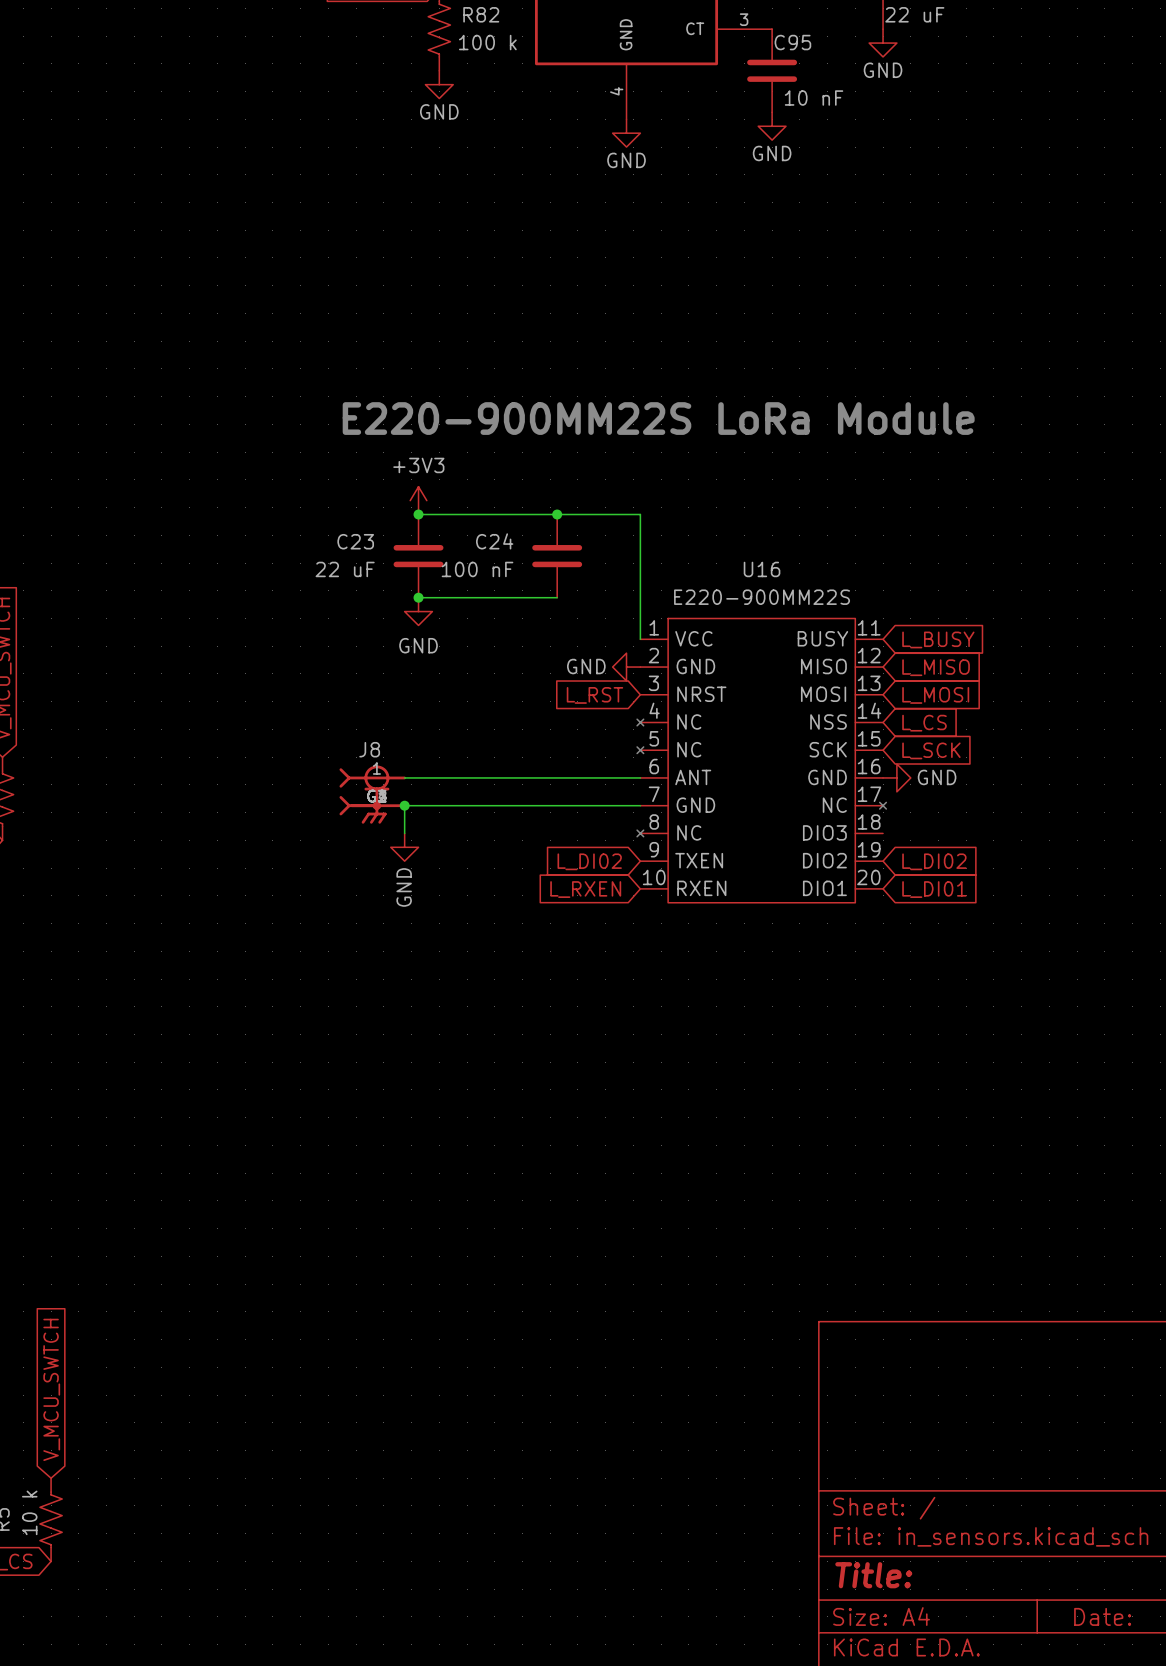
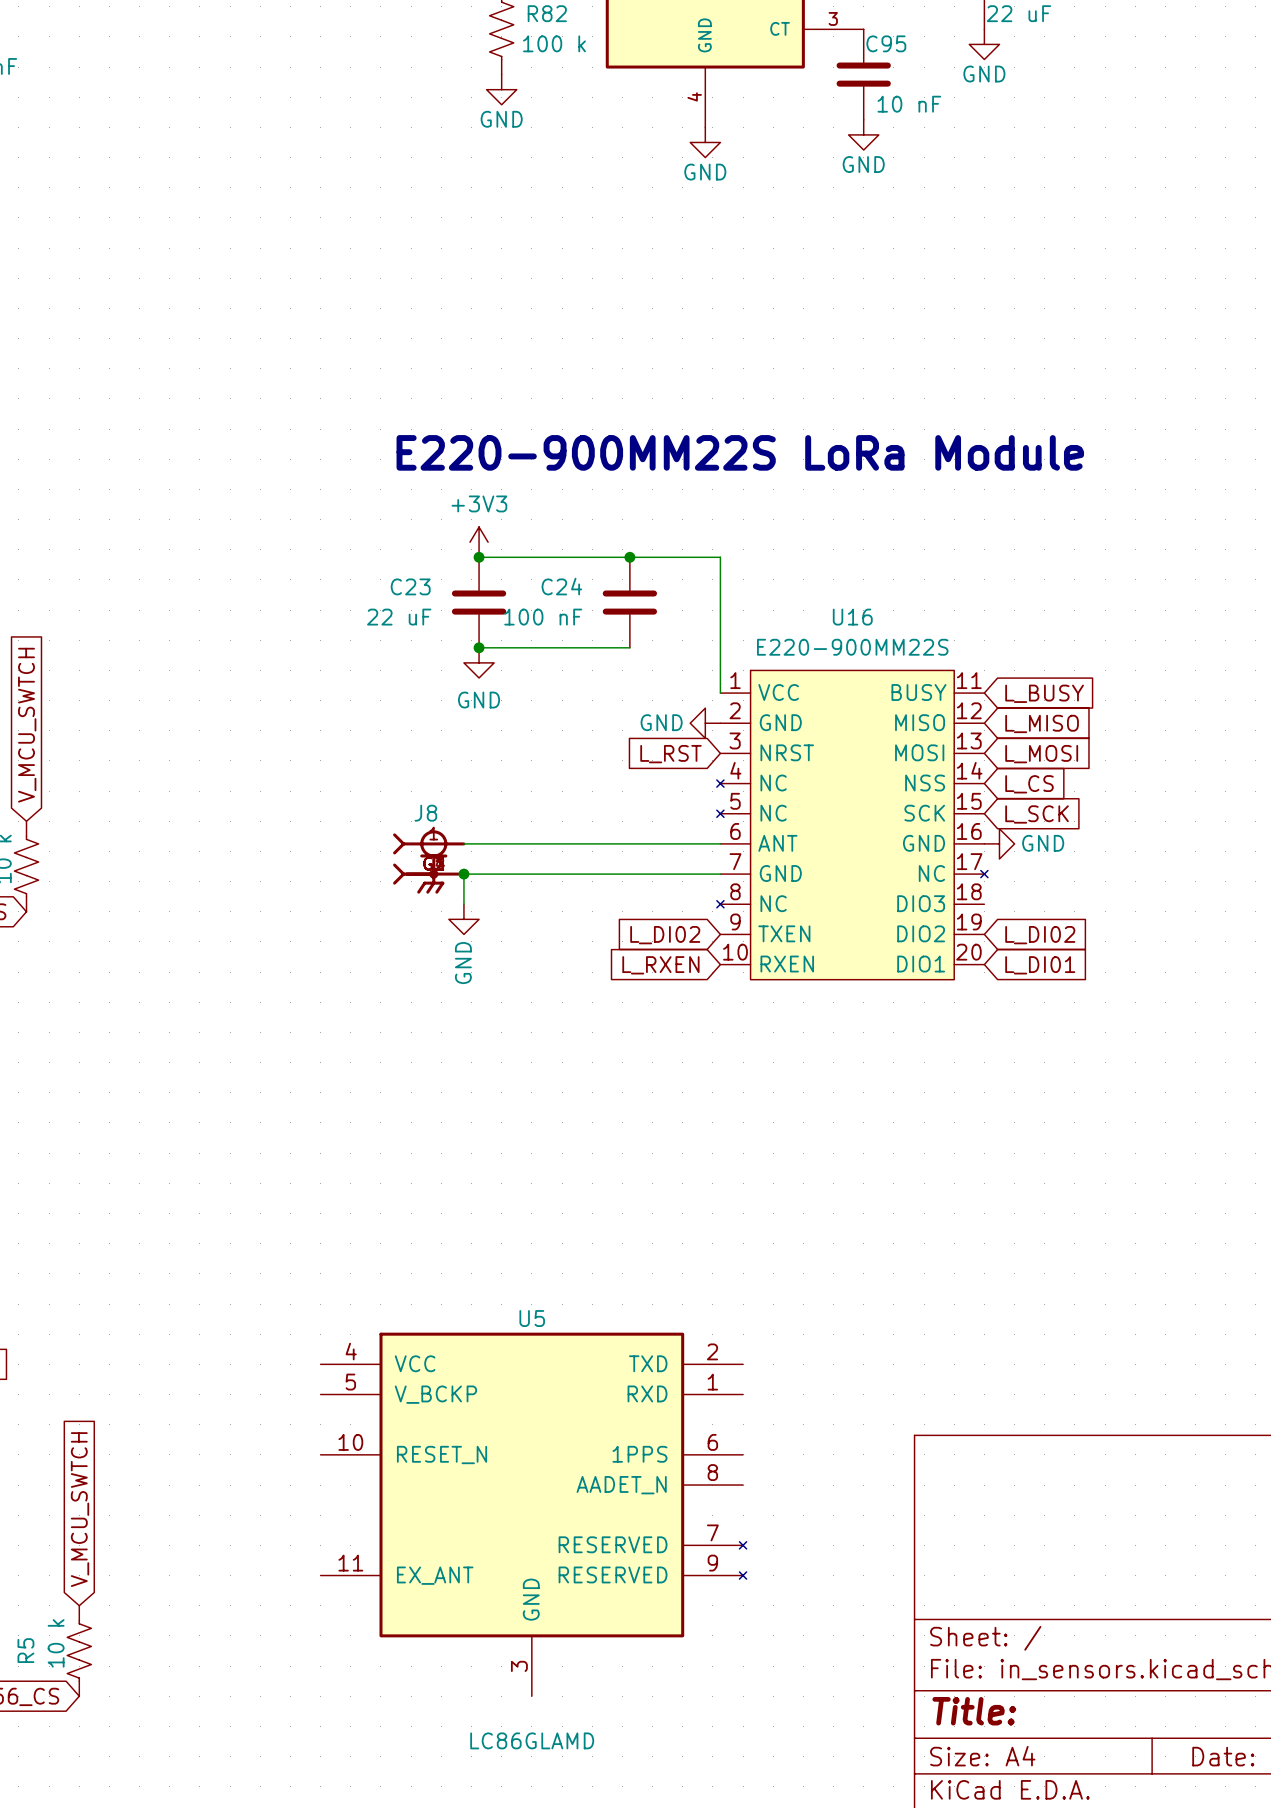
U5: none -> LC86GLAMD (533, 1514)

